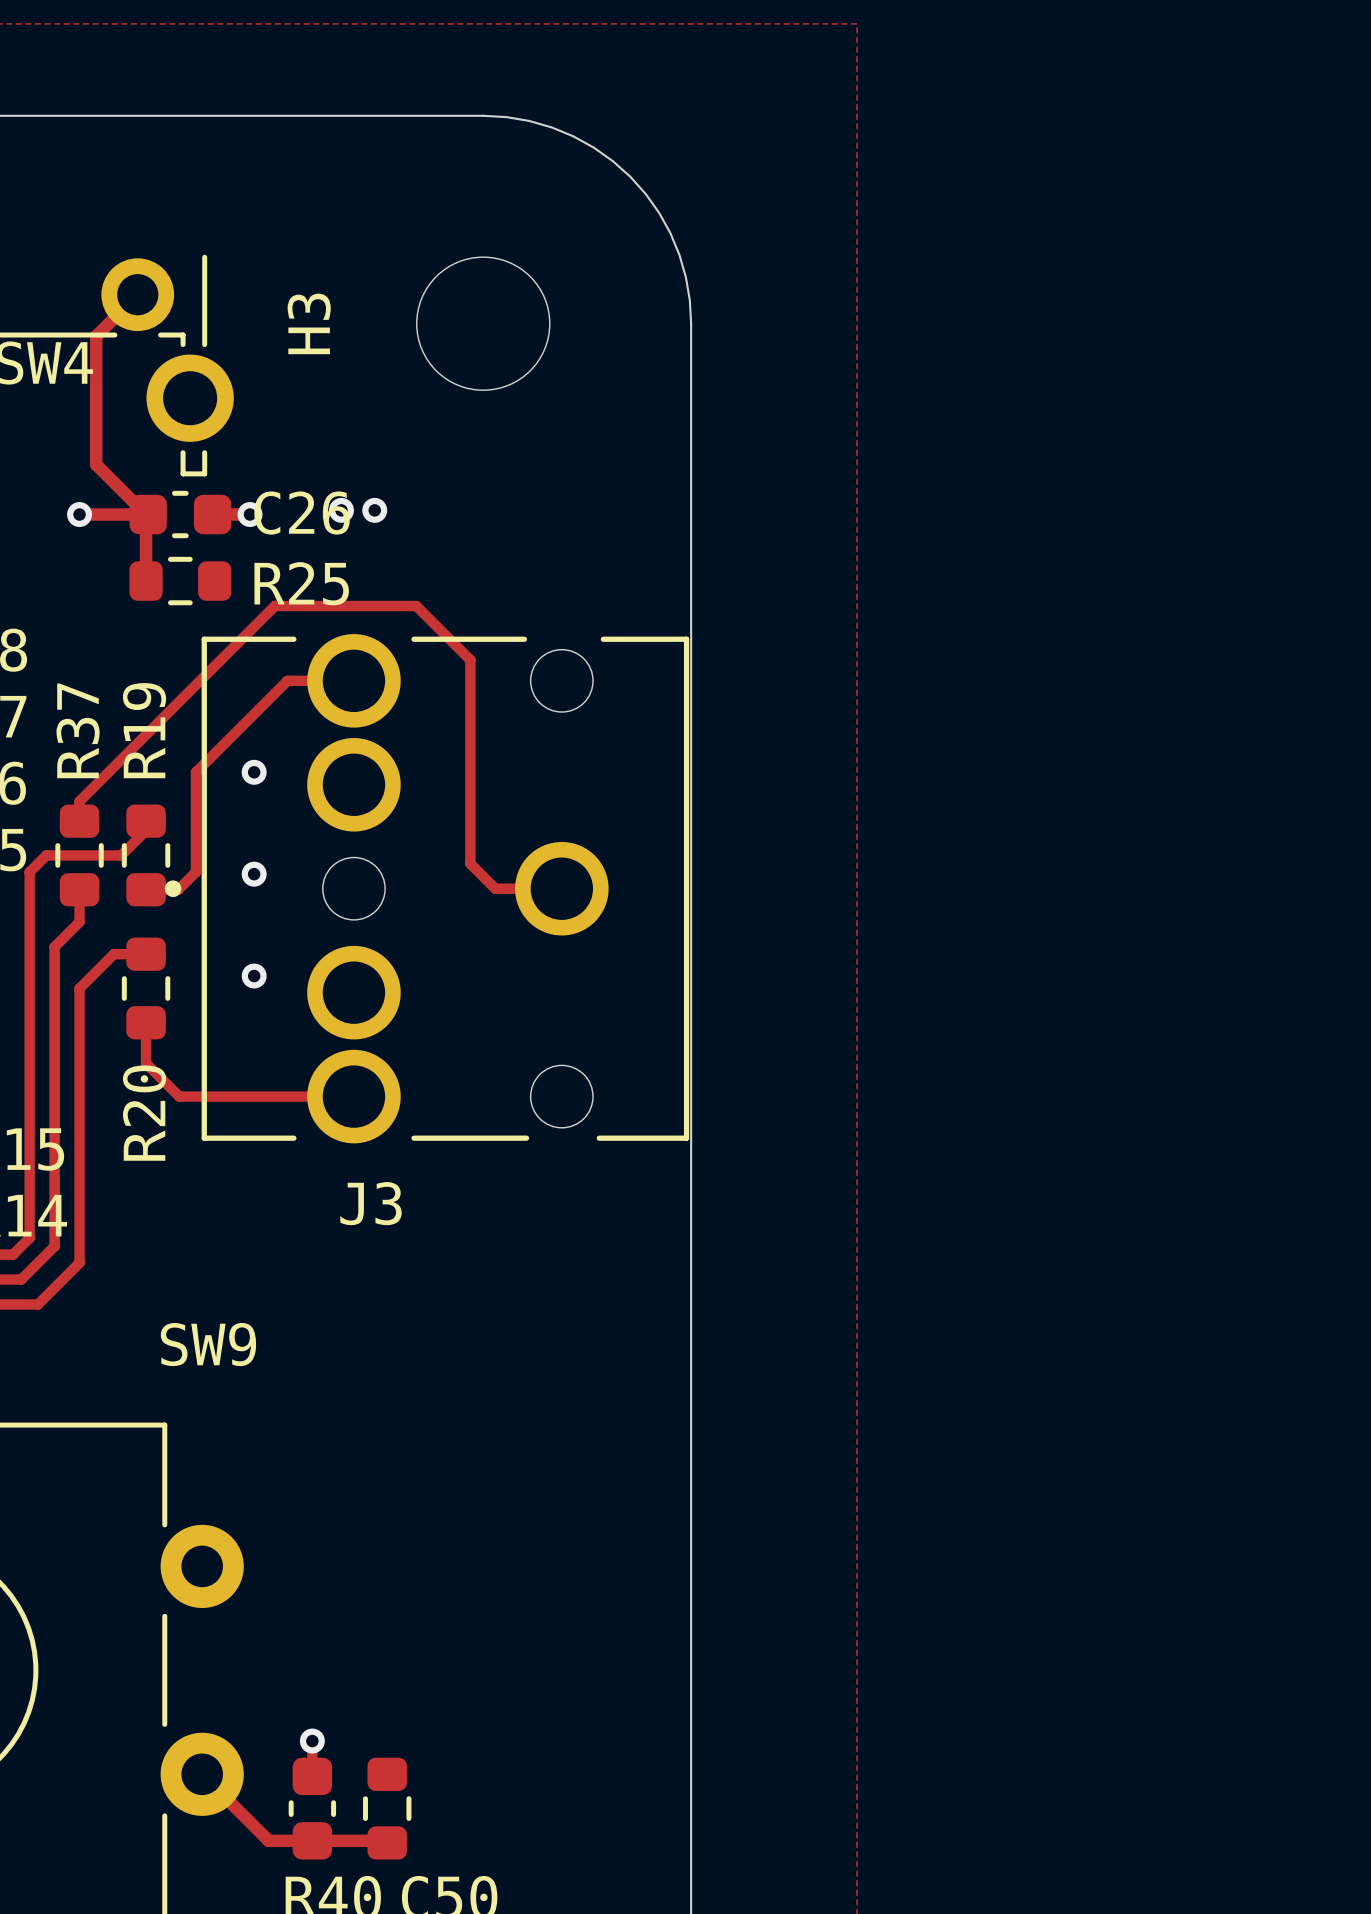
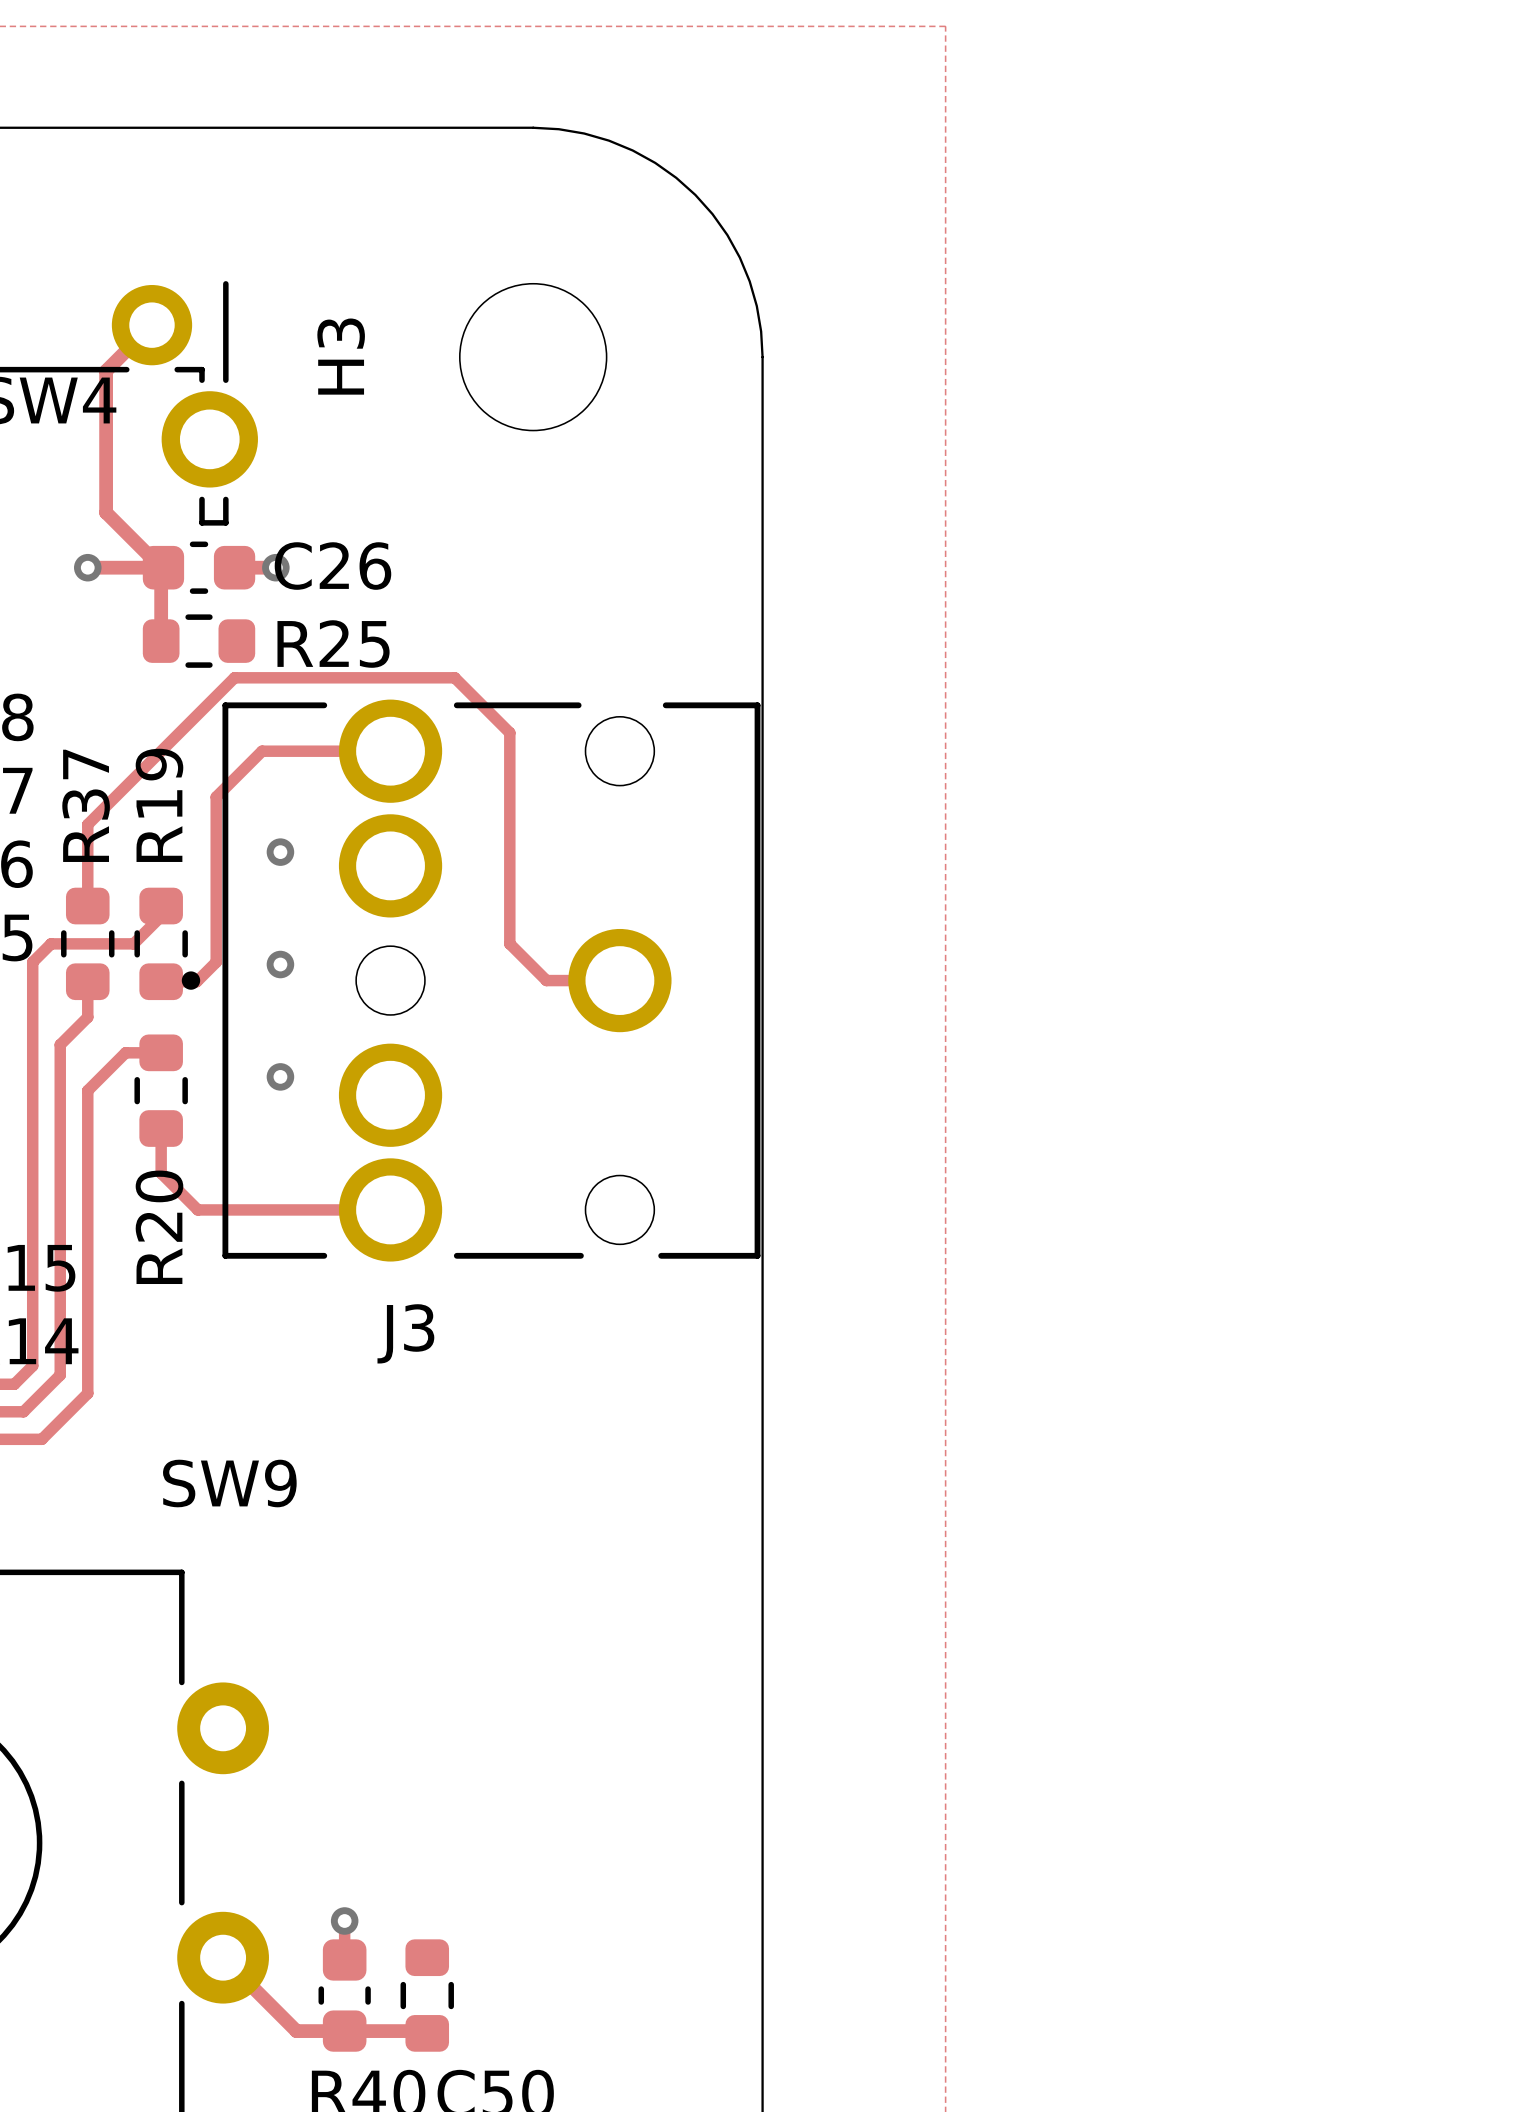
via: (341, 510) -> none
via: (374, 510) -> none
track: (287, 680) (195, 772) -> (317, 751) (262, 751) (216, 797) (216, 852)
track: (79, 801) (274, 605) (416, 605) (470, 660) (470, 863) -> (87, 884) (87, 824) (234, 677) (454, 677) (509, 732) (509, 943) (518, 953)

